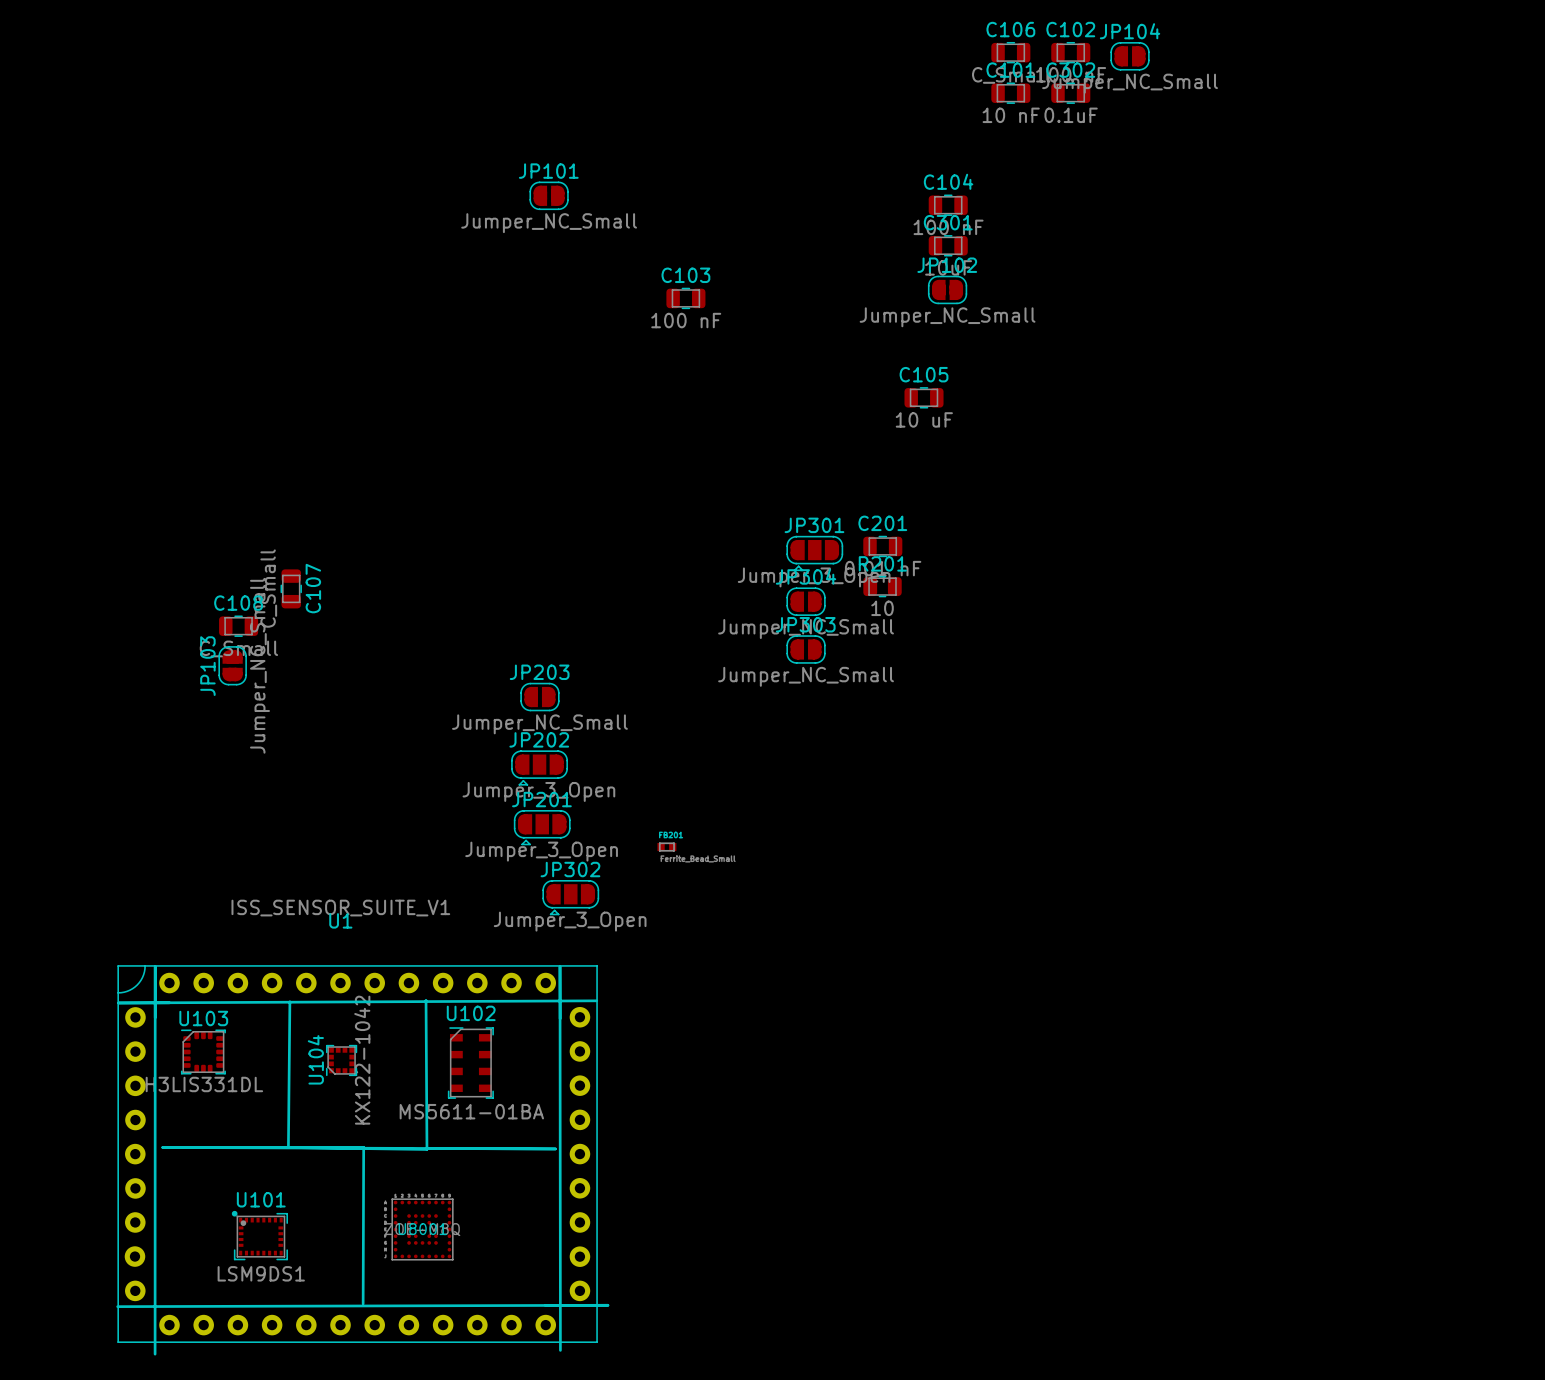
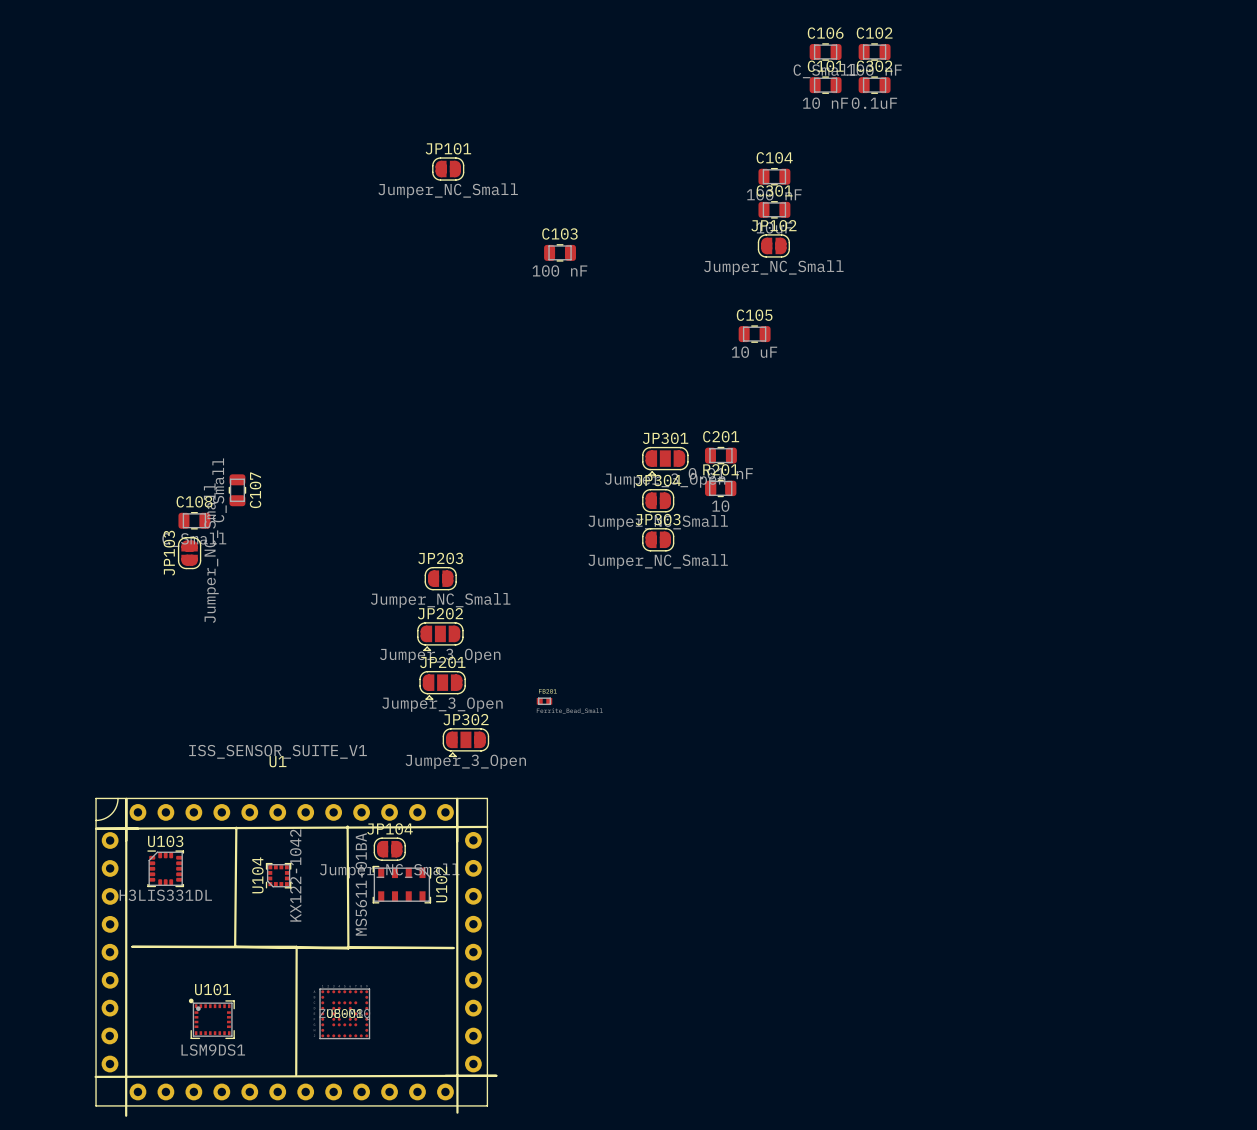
JP104 position: (1130, 56) -> (389, 849)
U102 rotation: 0° (470, 1063) -> 90° clockwise (401, 884)

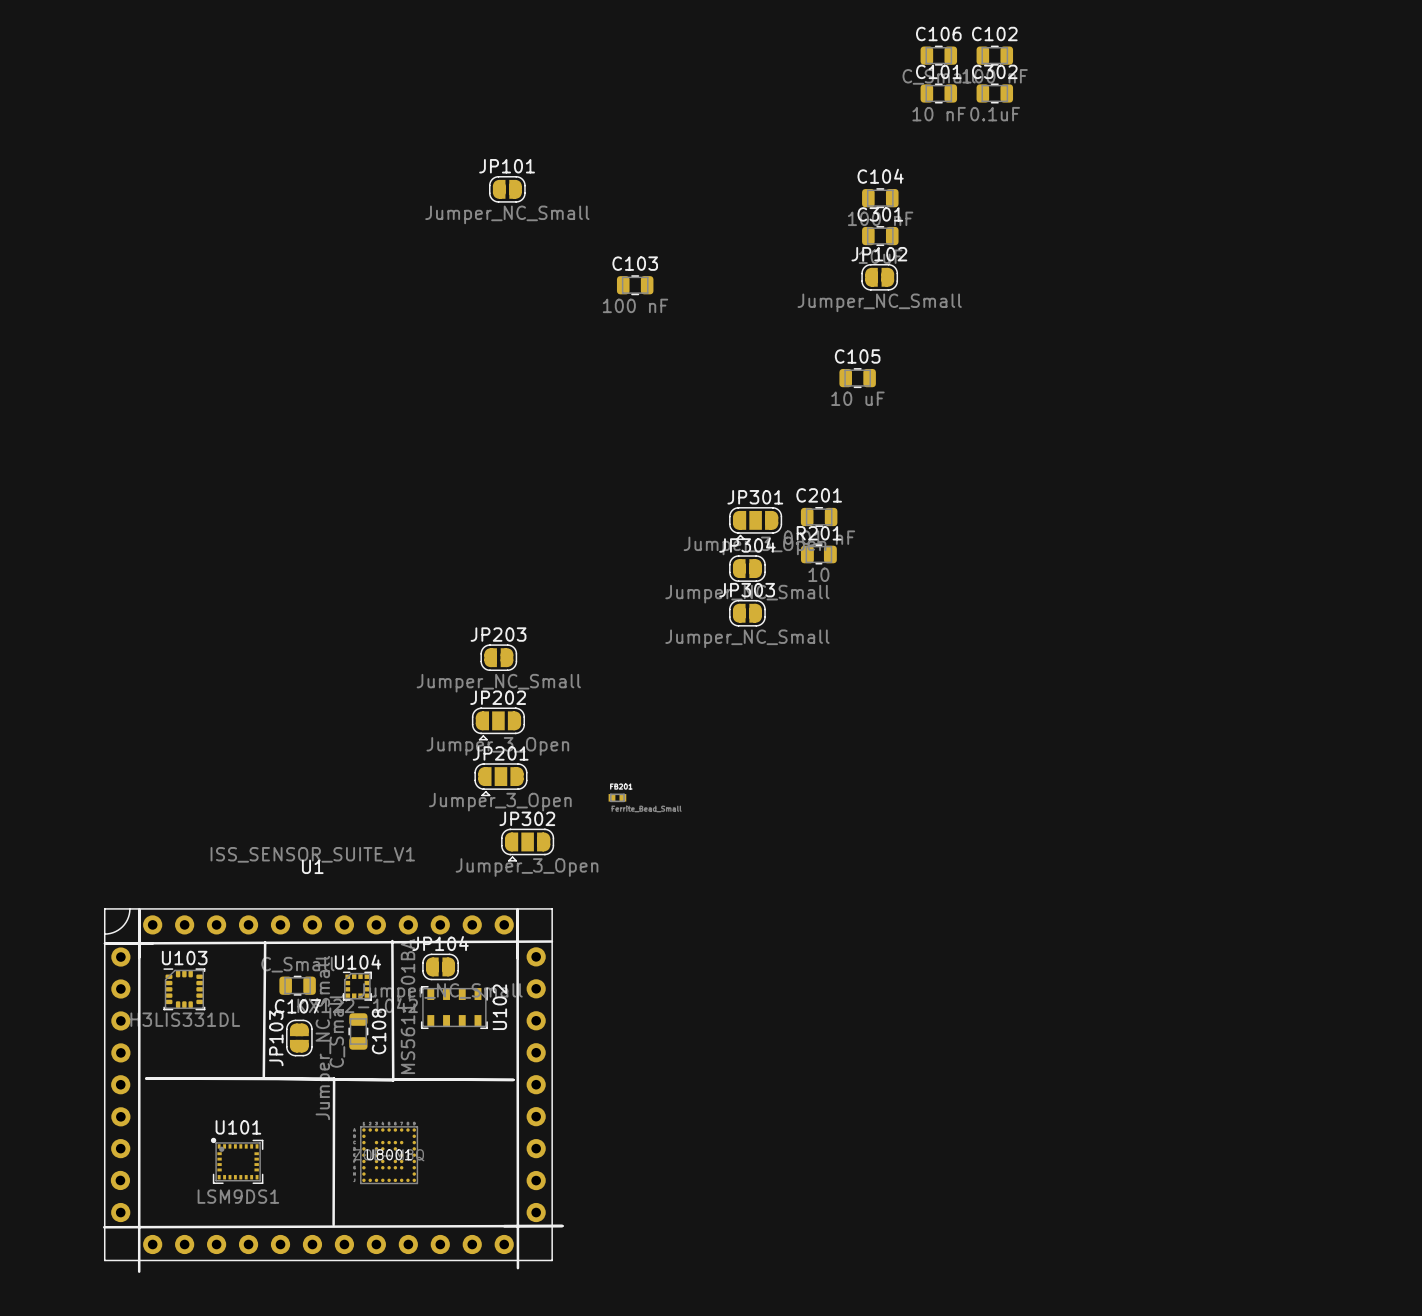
C107 rotation: 0° (237, 490) -> 90° clockwise (297, 985)
C107 position: (237, 490) -> (297, 985)
C108 rotation: 0° (194, 520) -> 90° clockwise (358, 1031)
C108 position: (194, 520) -> (358, 1031)
JP103 position: (189, 553) -> (299, 1038)
U104 rotation: 0° (278, 875) -> 90° clockwise (357, 986)
U104 position: (278, 875) -> (357, 986)

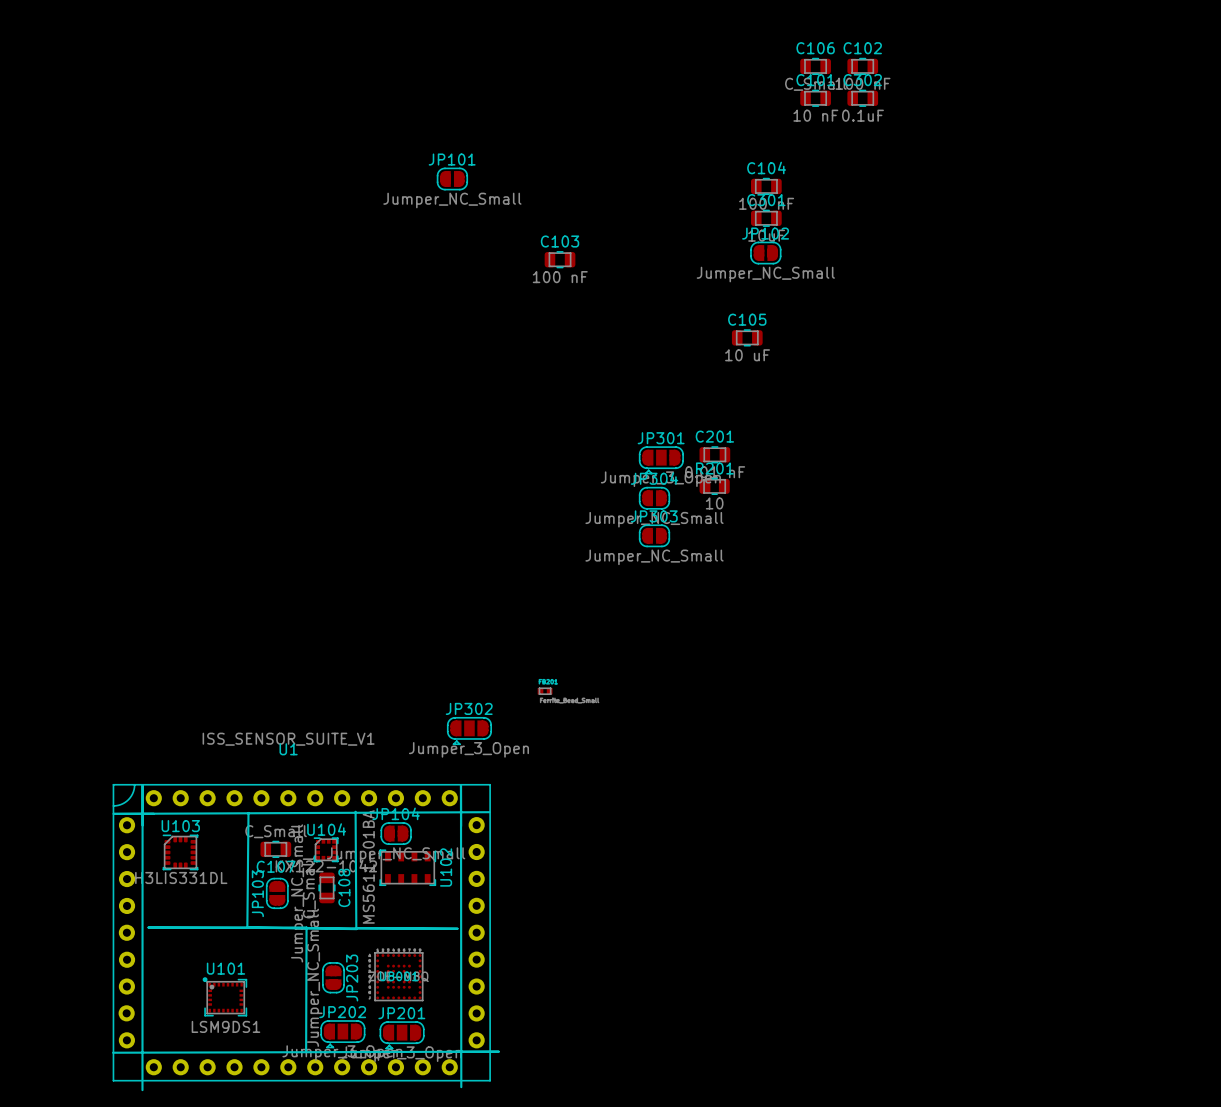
JP203 rotation: 0° (498, 657) -> 90° clockwise (333, 977)
JP203 position: (498, 657) -> (333, 977)
JP202 position: (498, 723) -> (342, 1034)
JP201 position: (500, 779) -> (402, 1035)
U8001 position: (389, 1155) -> (398, 976)

